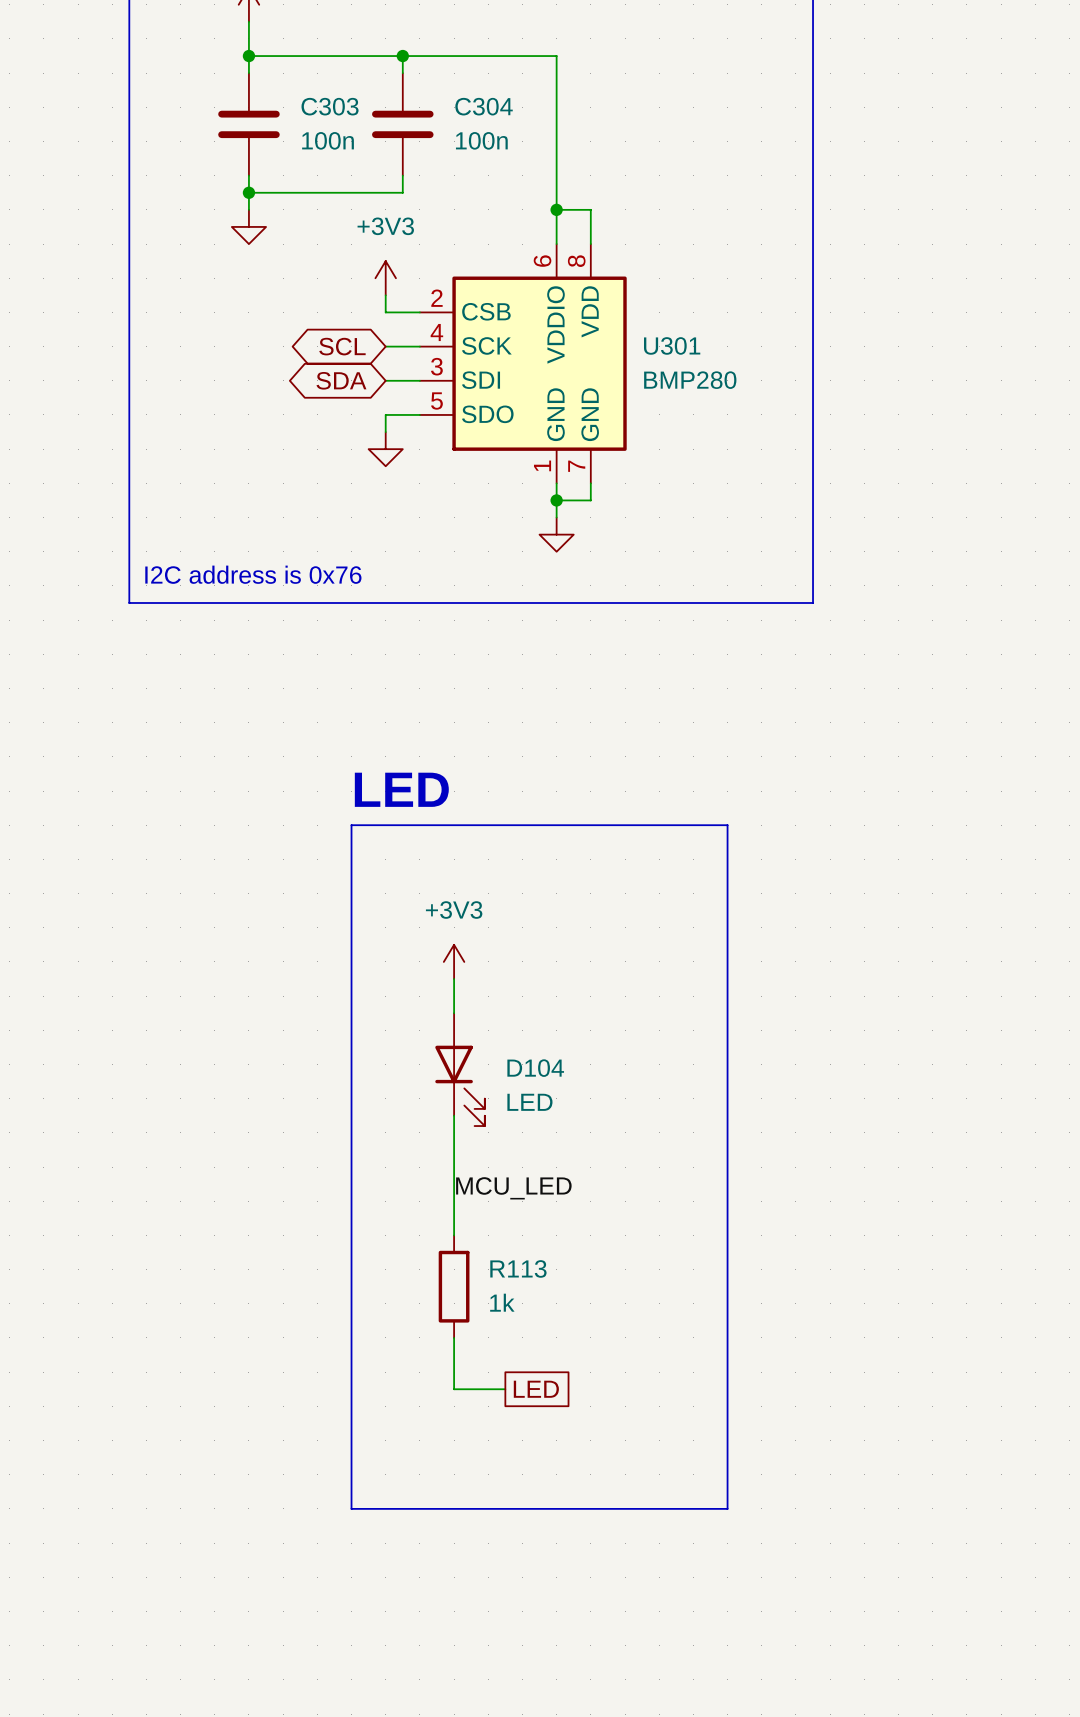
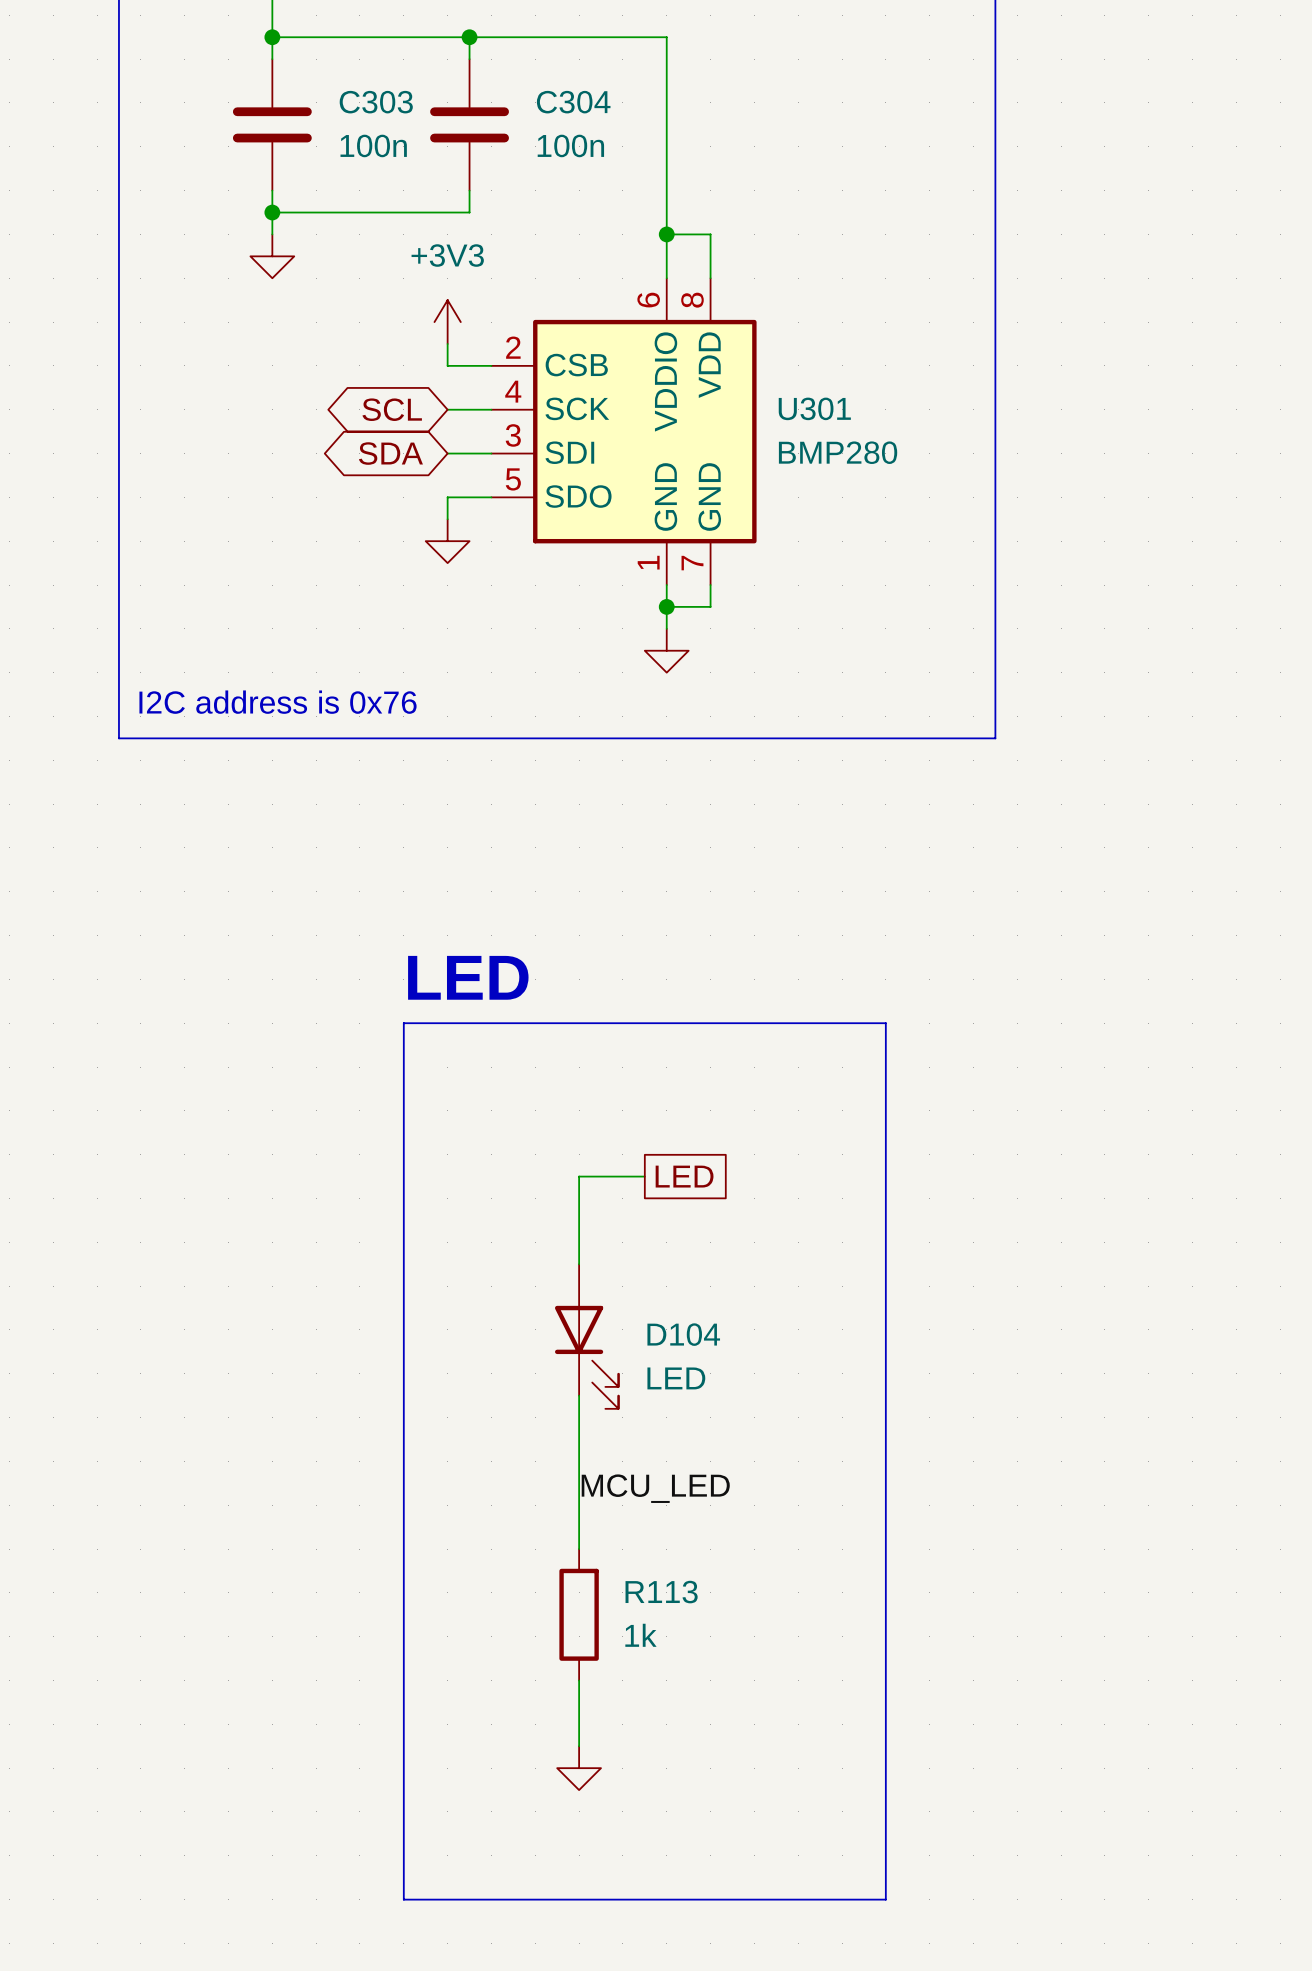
wire: none -> (644, 1176) (579, 1176) (579, 1264)
global label: none -> LED (684, 1176)
power symbol: +3V3 (454, 961) -> none
wire: (454, 979) (454, 1013) -> none
D104 position: (460, 1069) -> (586, 1336)
wire: (454, 1115) (454, 1235) -> (579, 1395) (579, 1549)
label position: MCU_LED (513, 1188) -> MCU_LED (655, 1488)
R113 position: (454, 1286) -> (579, 1614)
wire: (454, 1337) (454, 1389) (505, 1389) -> none
wire: none -> (579, 1680) (579, 1746)
global label: LED (536, 1389) -> none
power symbol: none -> (579, 1768)

